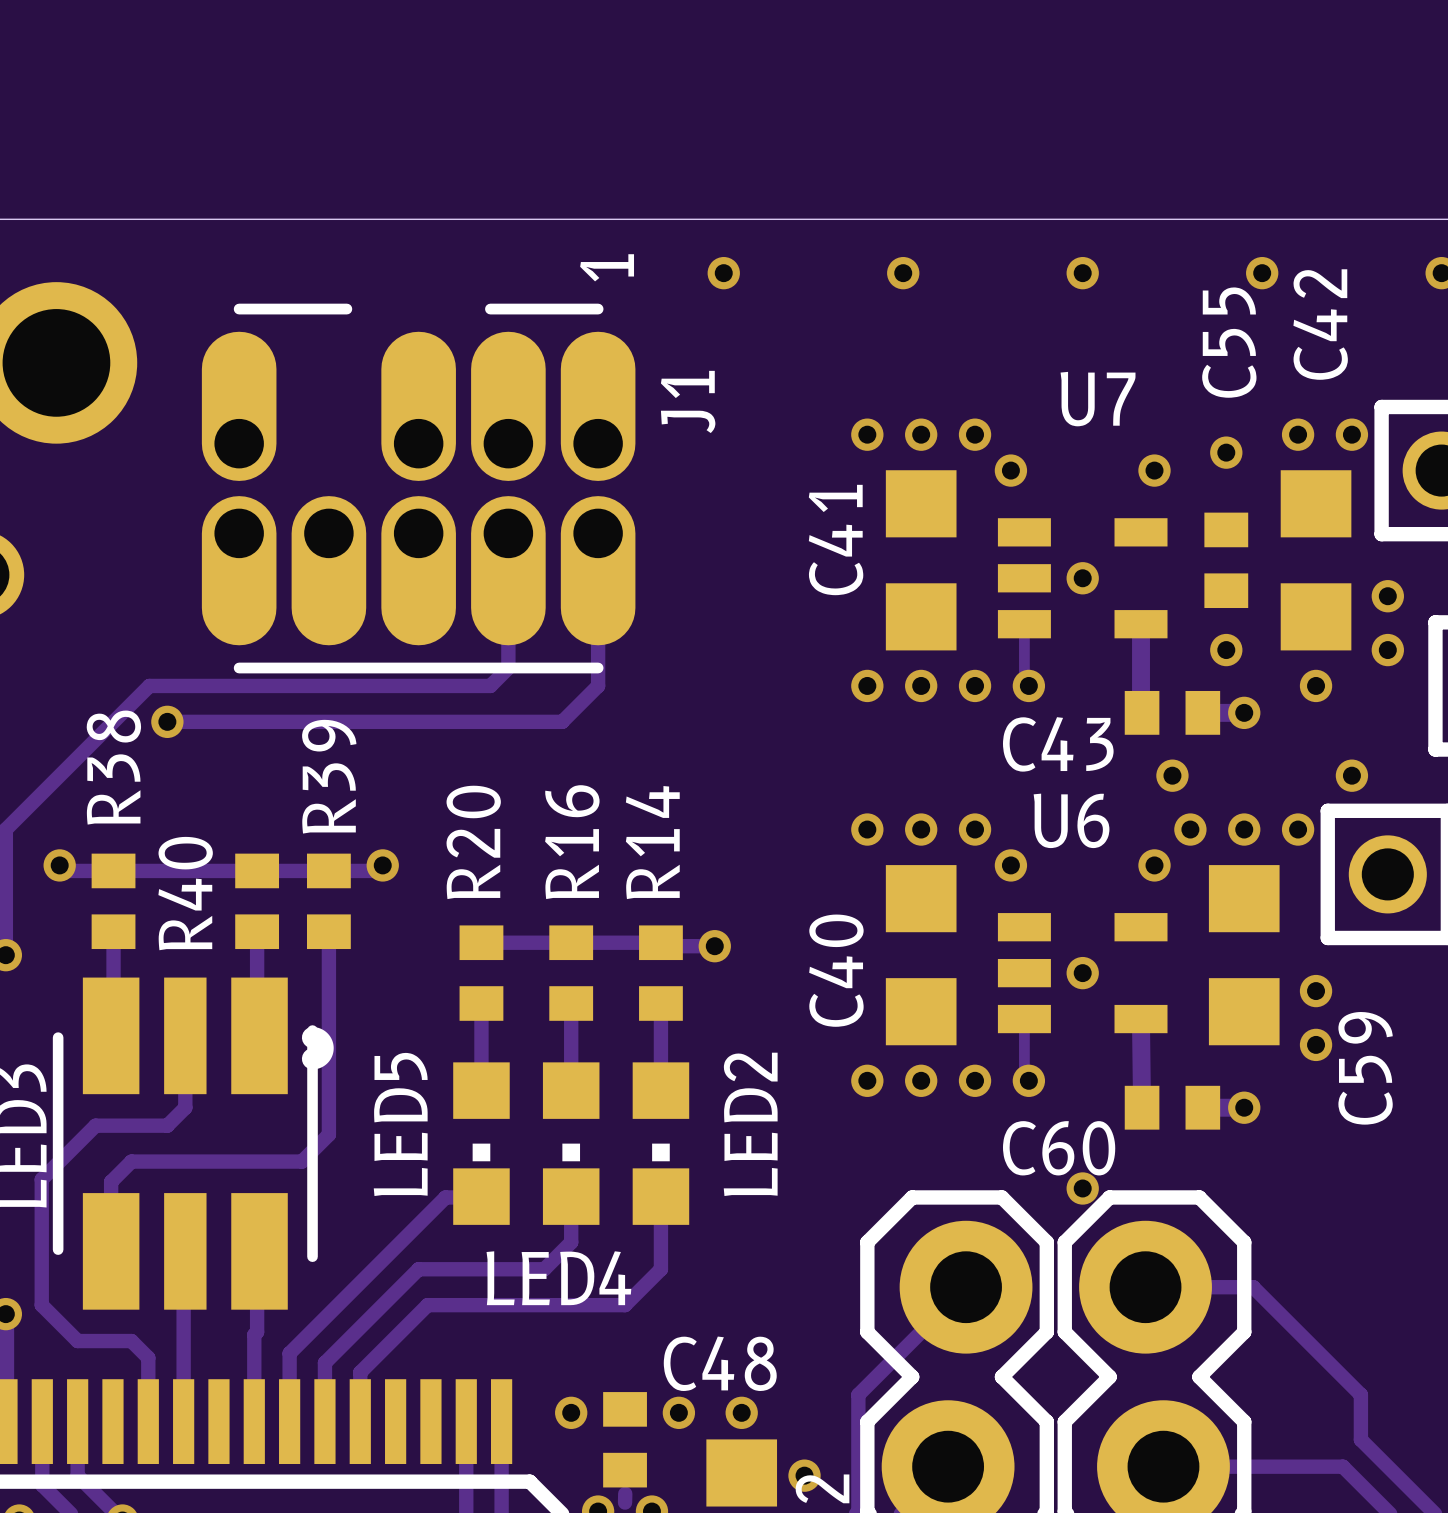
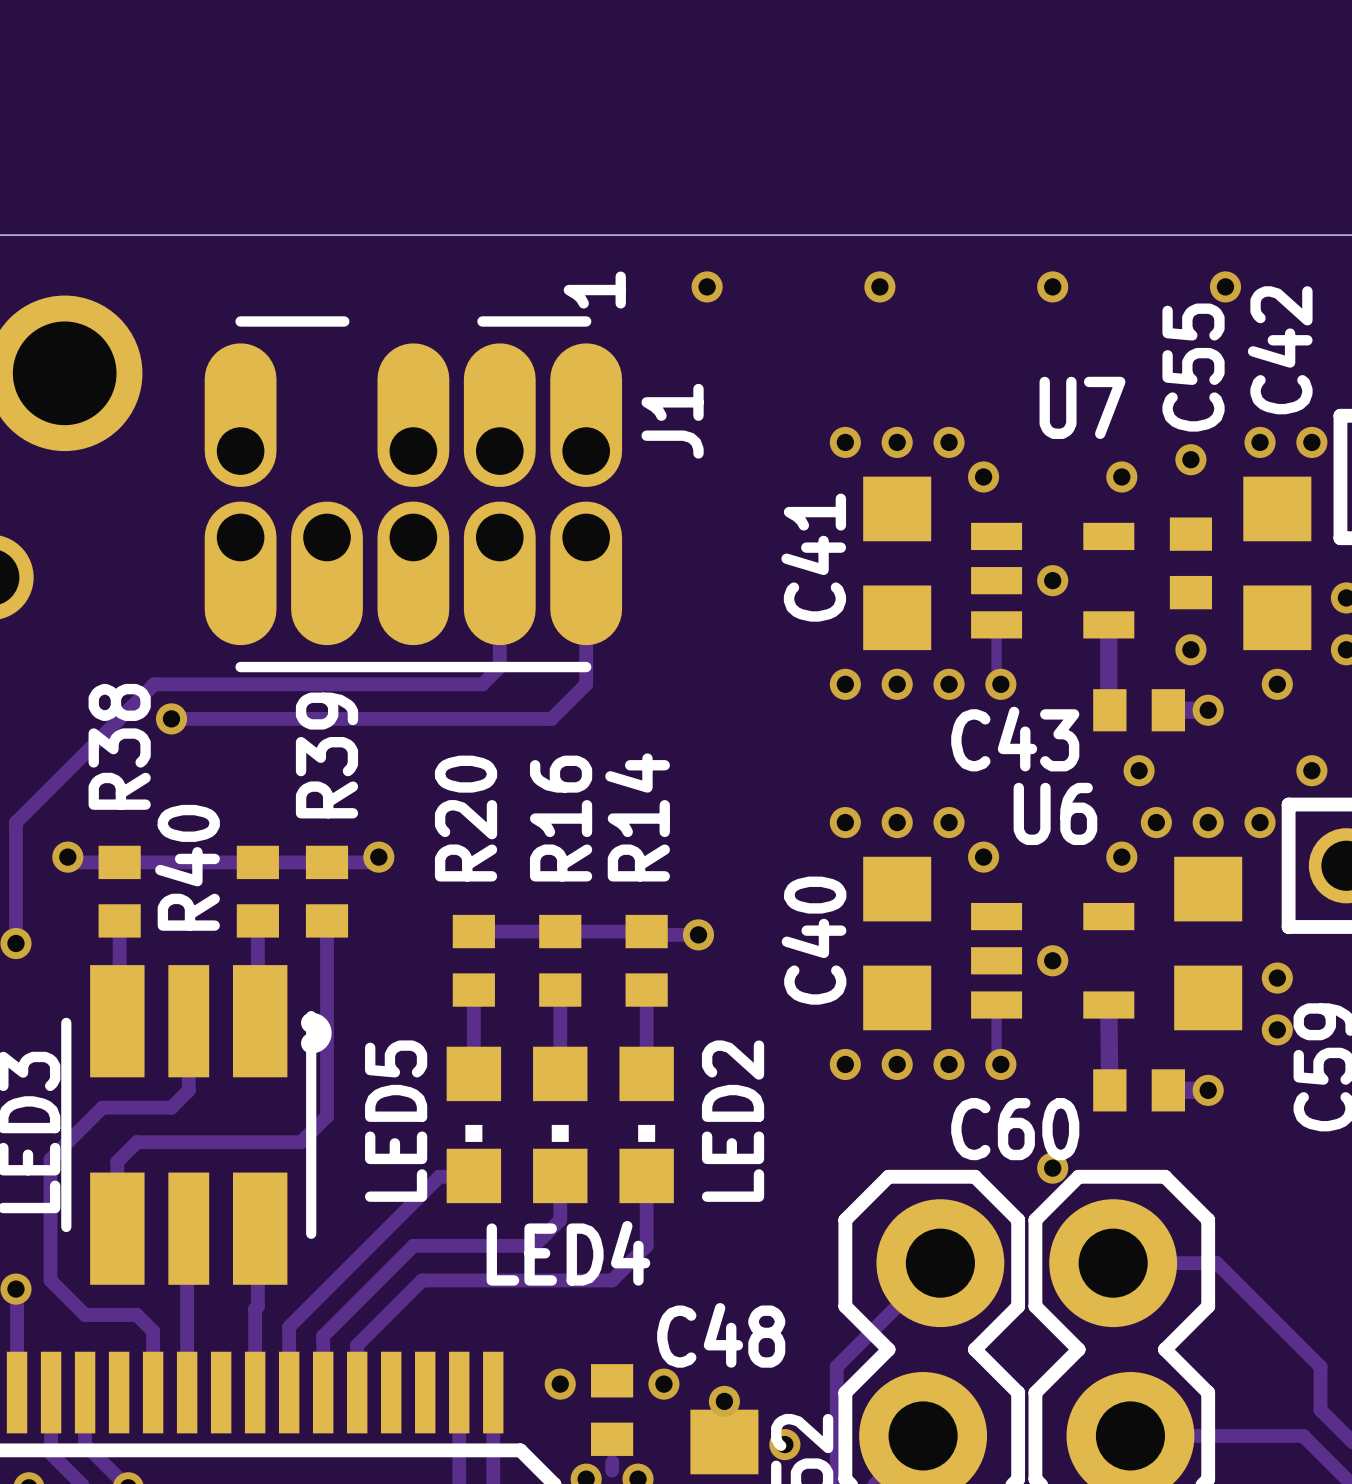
via position: (741, 1412) -> (724, 1401)

